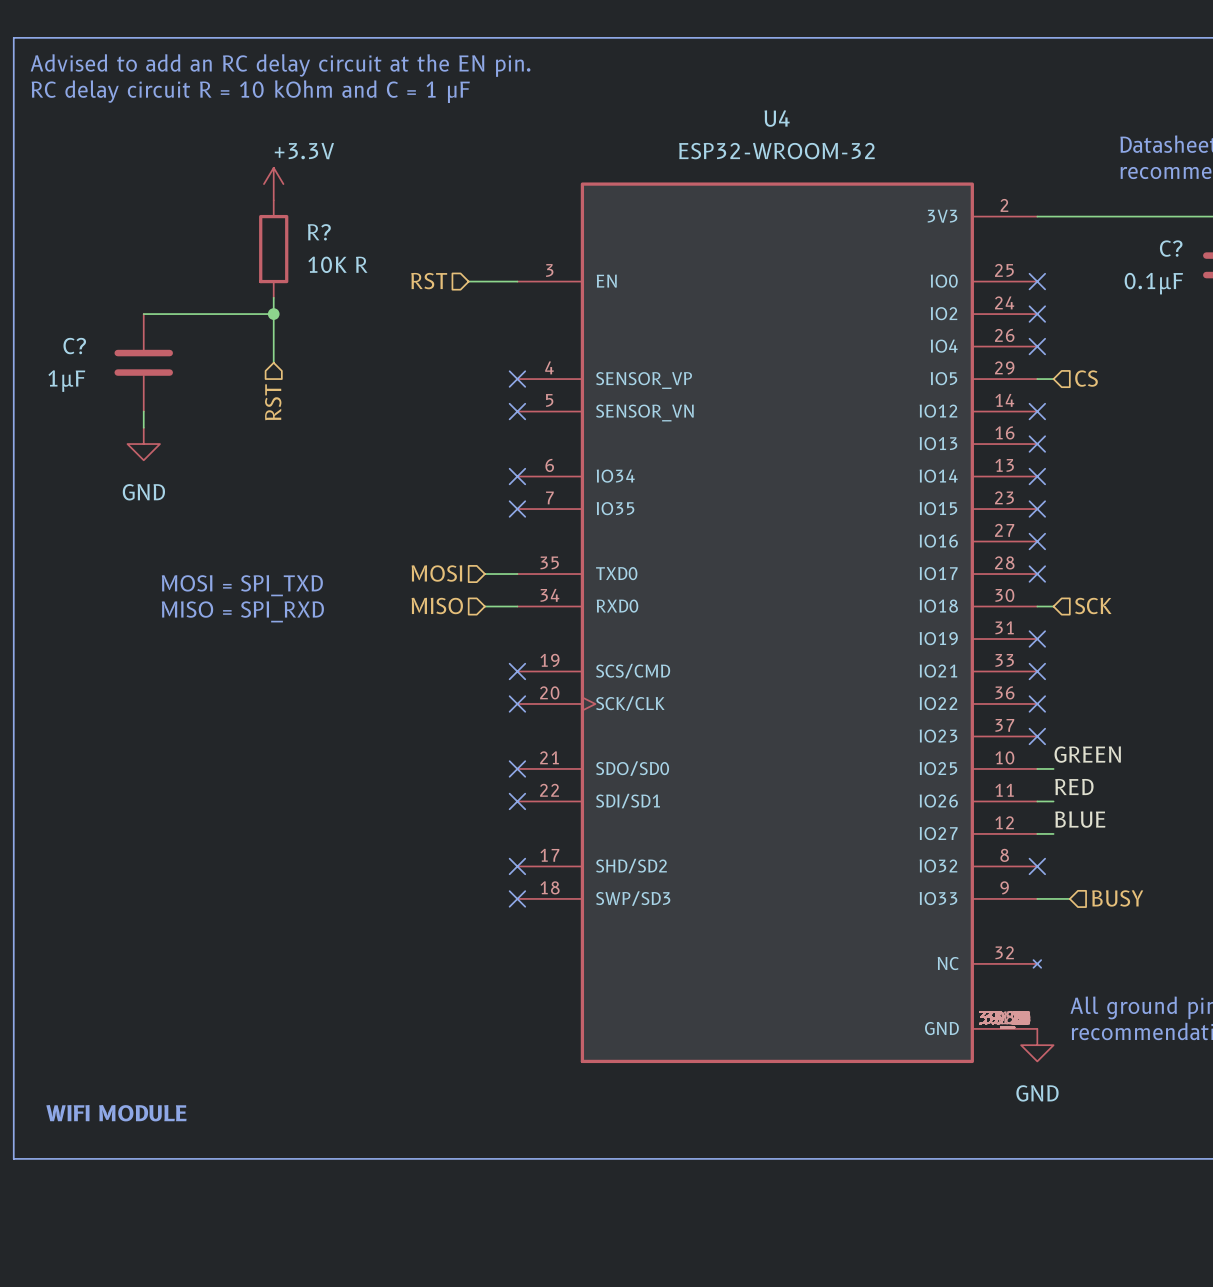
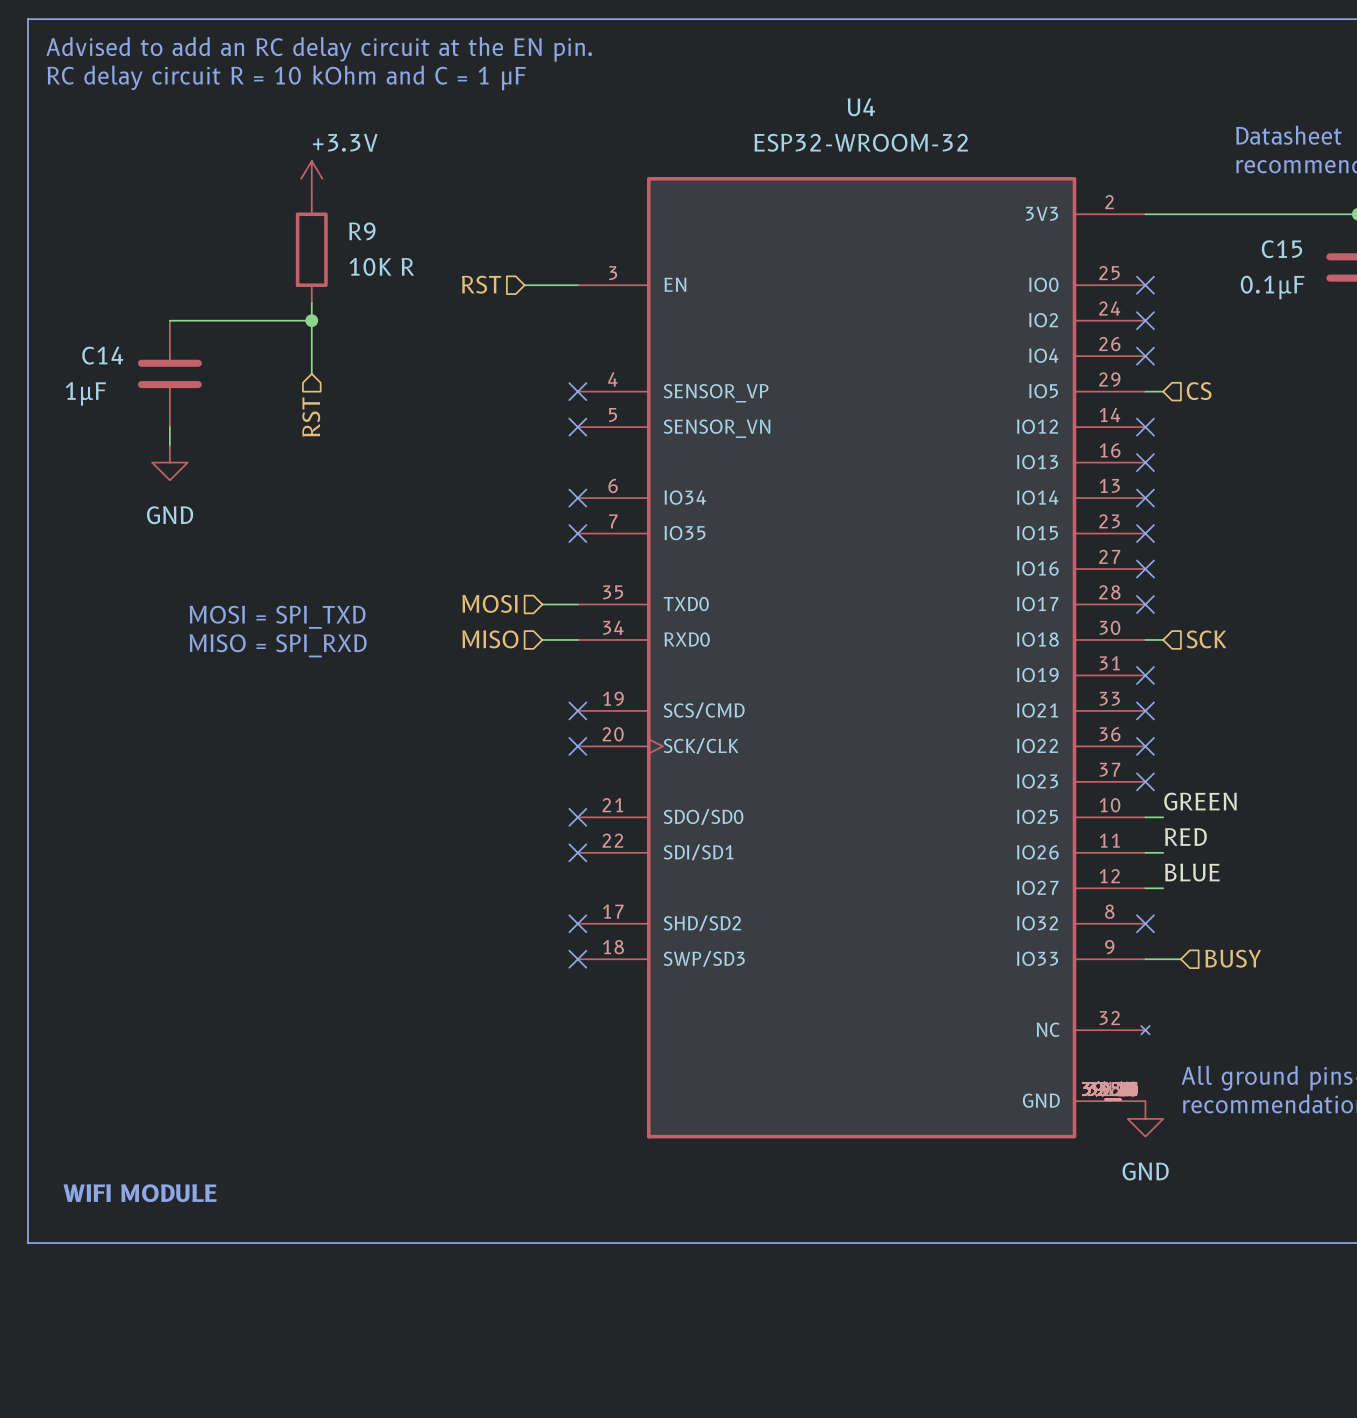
R? name: R? (319, 232) -> R9 (362, 231)
C? name: C? (1171, 248) -> C15 (1281, 249)
C? name: C? (74, 346) -> C14 (102, 355)

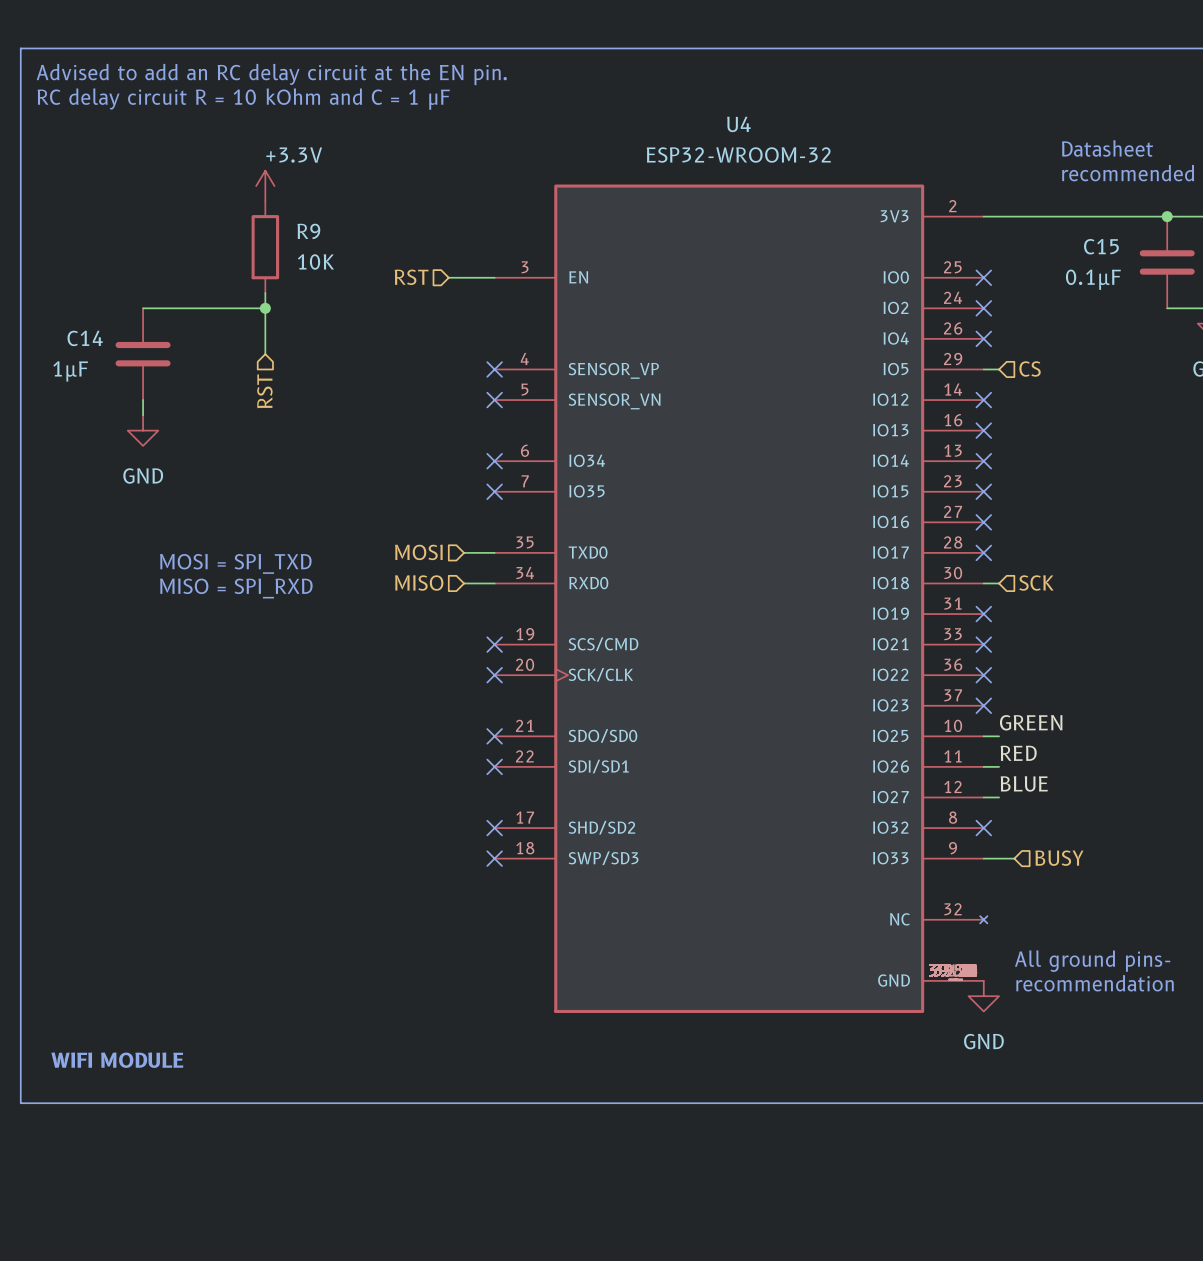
R9 value: 10K R (381, 266) -> 10K (315, 261)

